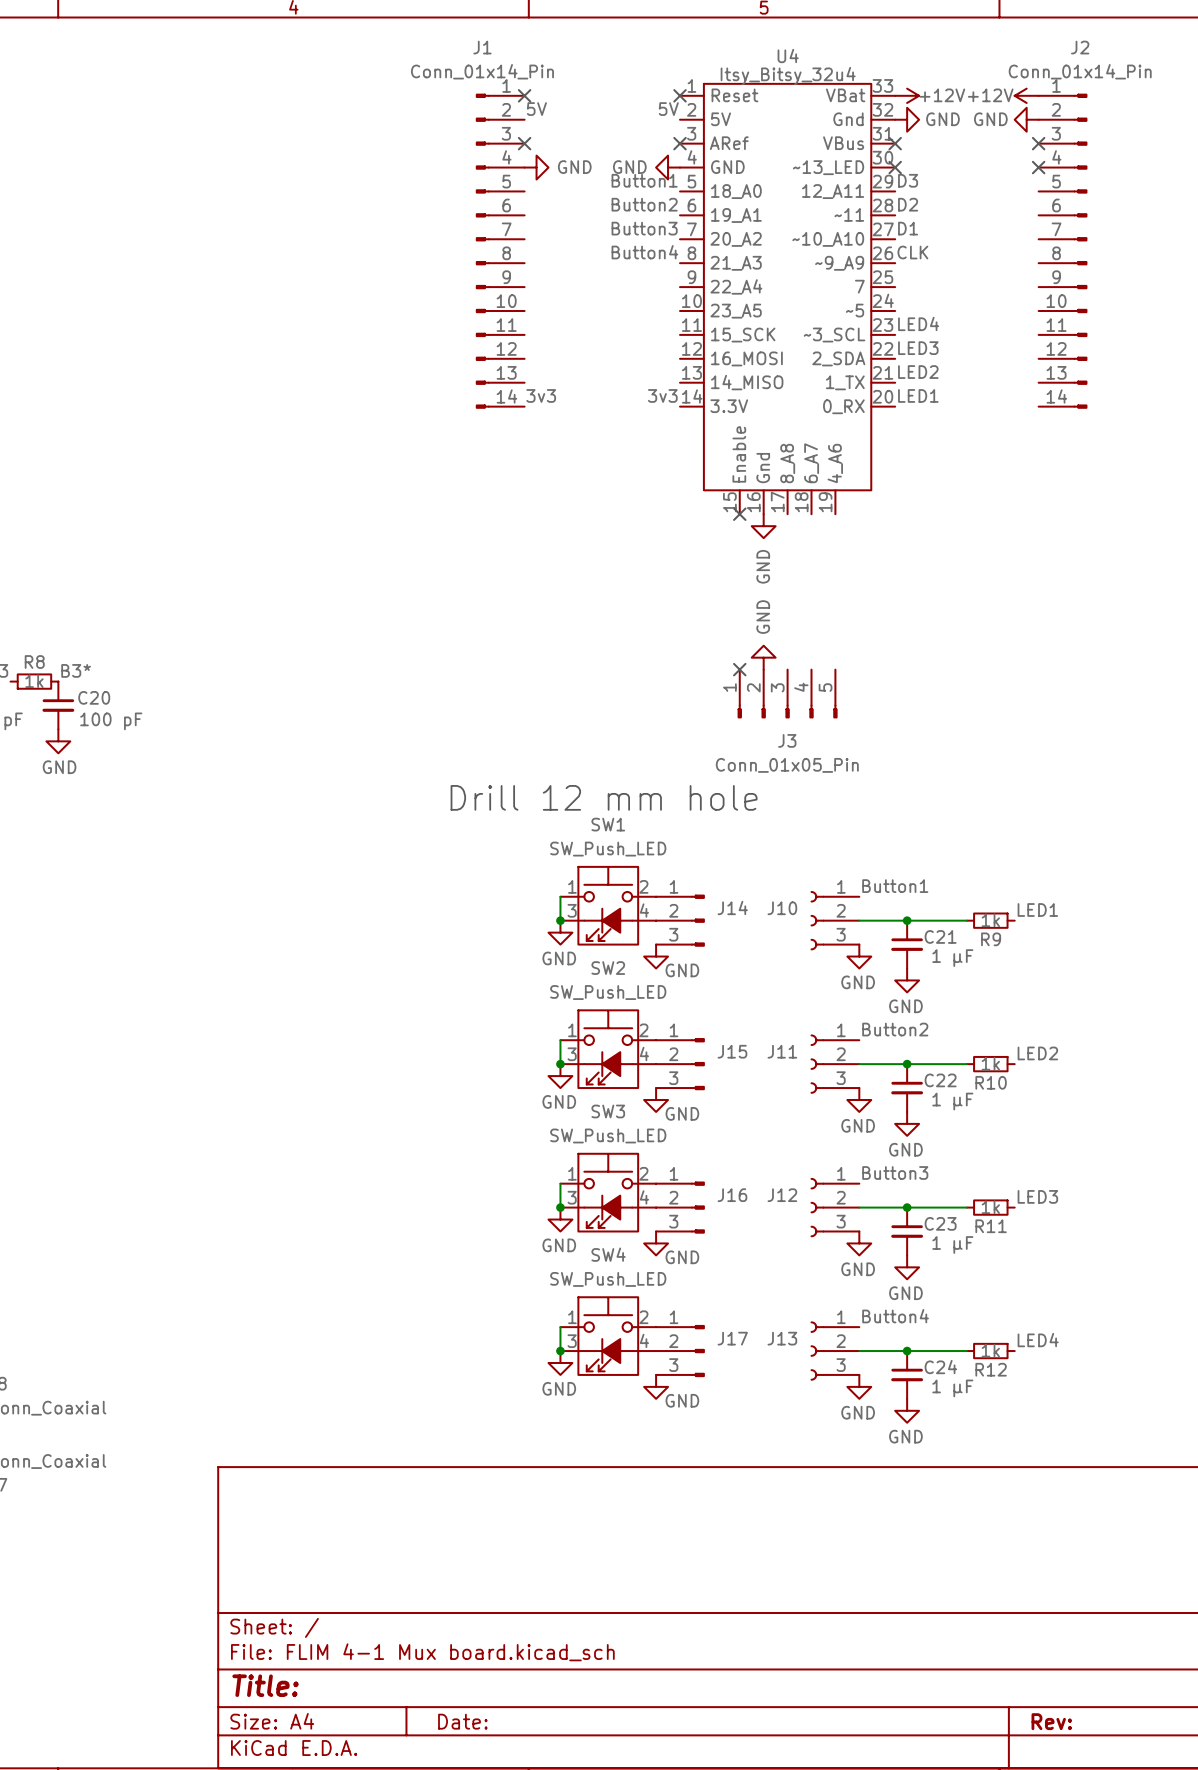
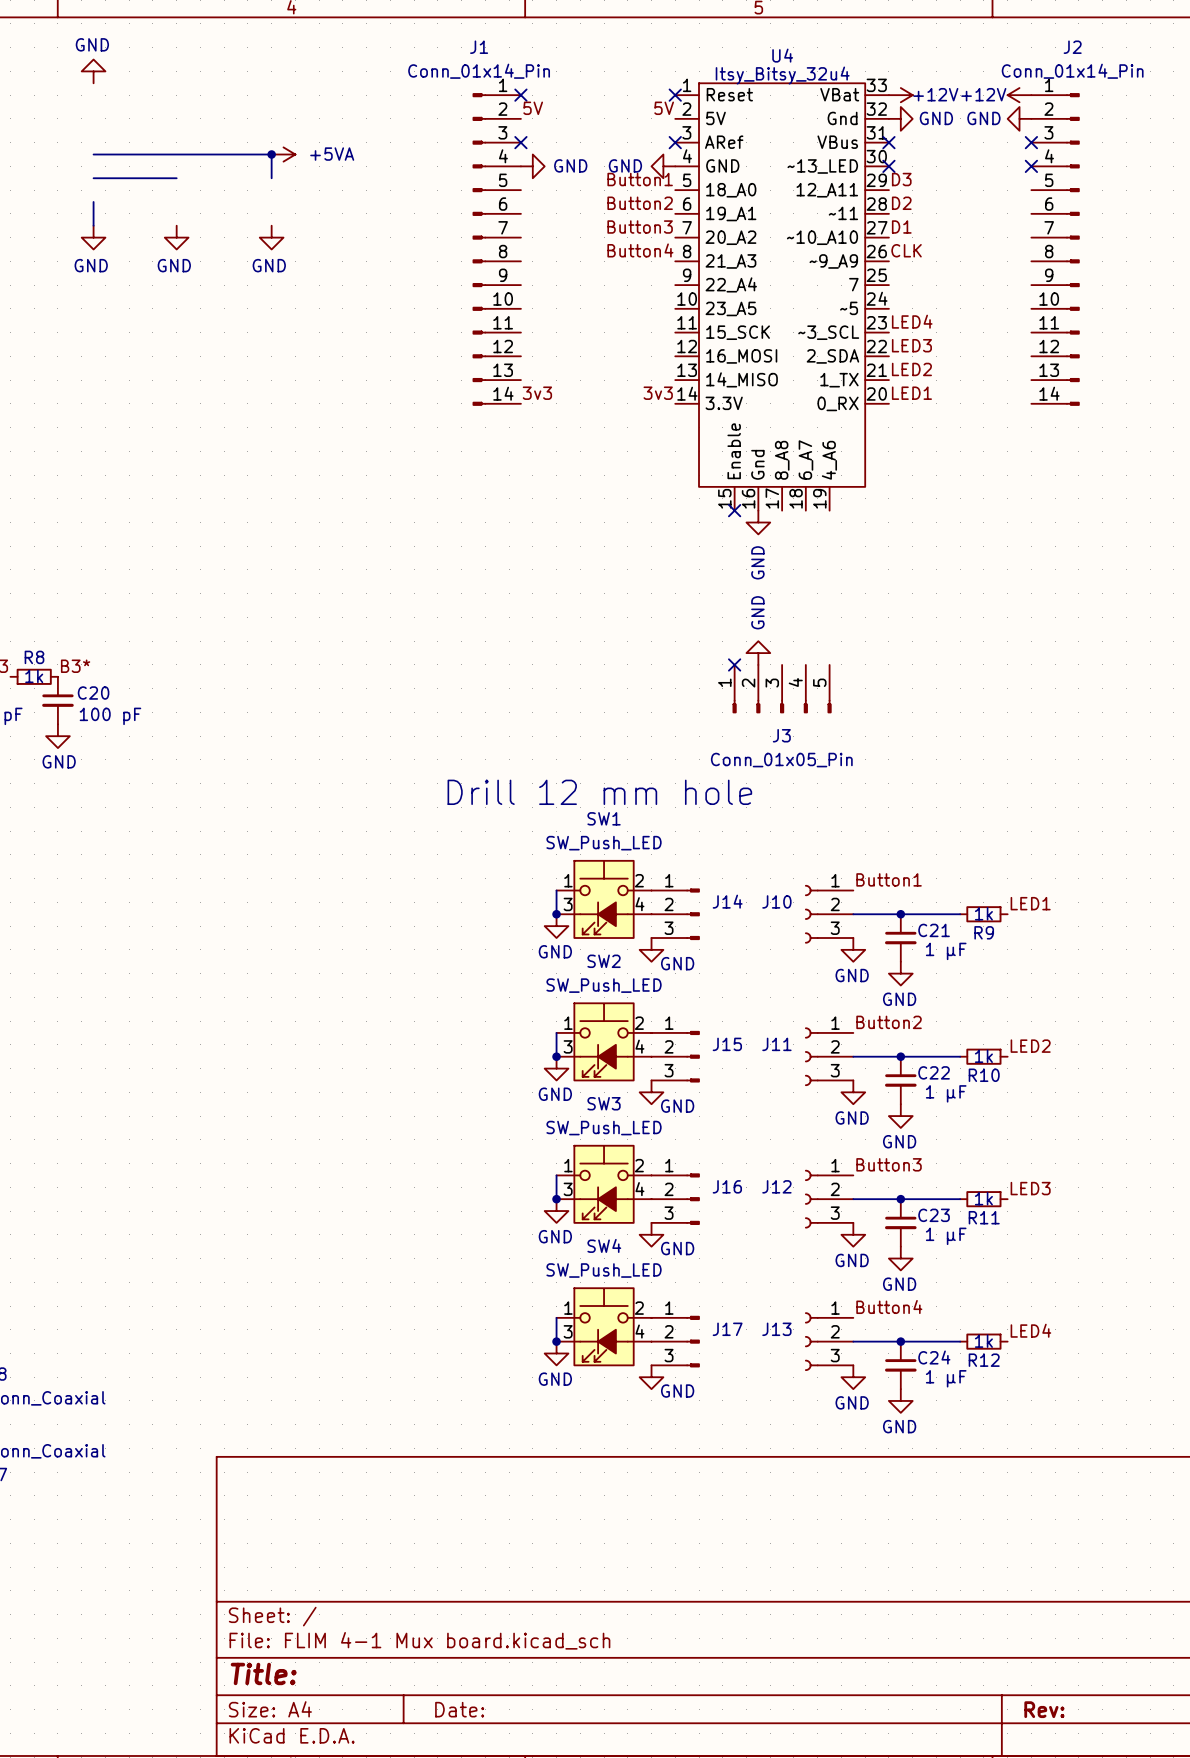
power symbol: none -> GND (93, 71)
wire: none -> (93, 154) (271, 154) (271, 178)
junction: none -> (271, 154)
power symbol: none -> +5VA (283, 154)
wire: none -> (93, 178) (176, 178)
wire: none -> (93, 201) (93, 225)
power symbol: none -> GND (93, 237)
power symbol: none -> GND (176, 237)
power symbol: none -> GND (271, 237)

